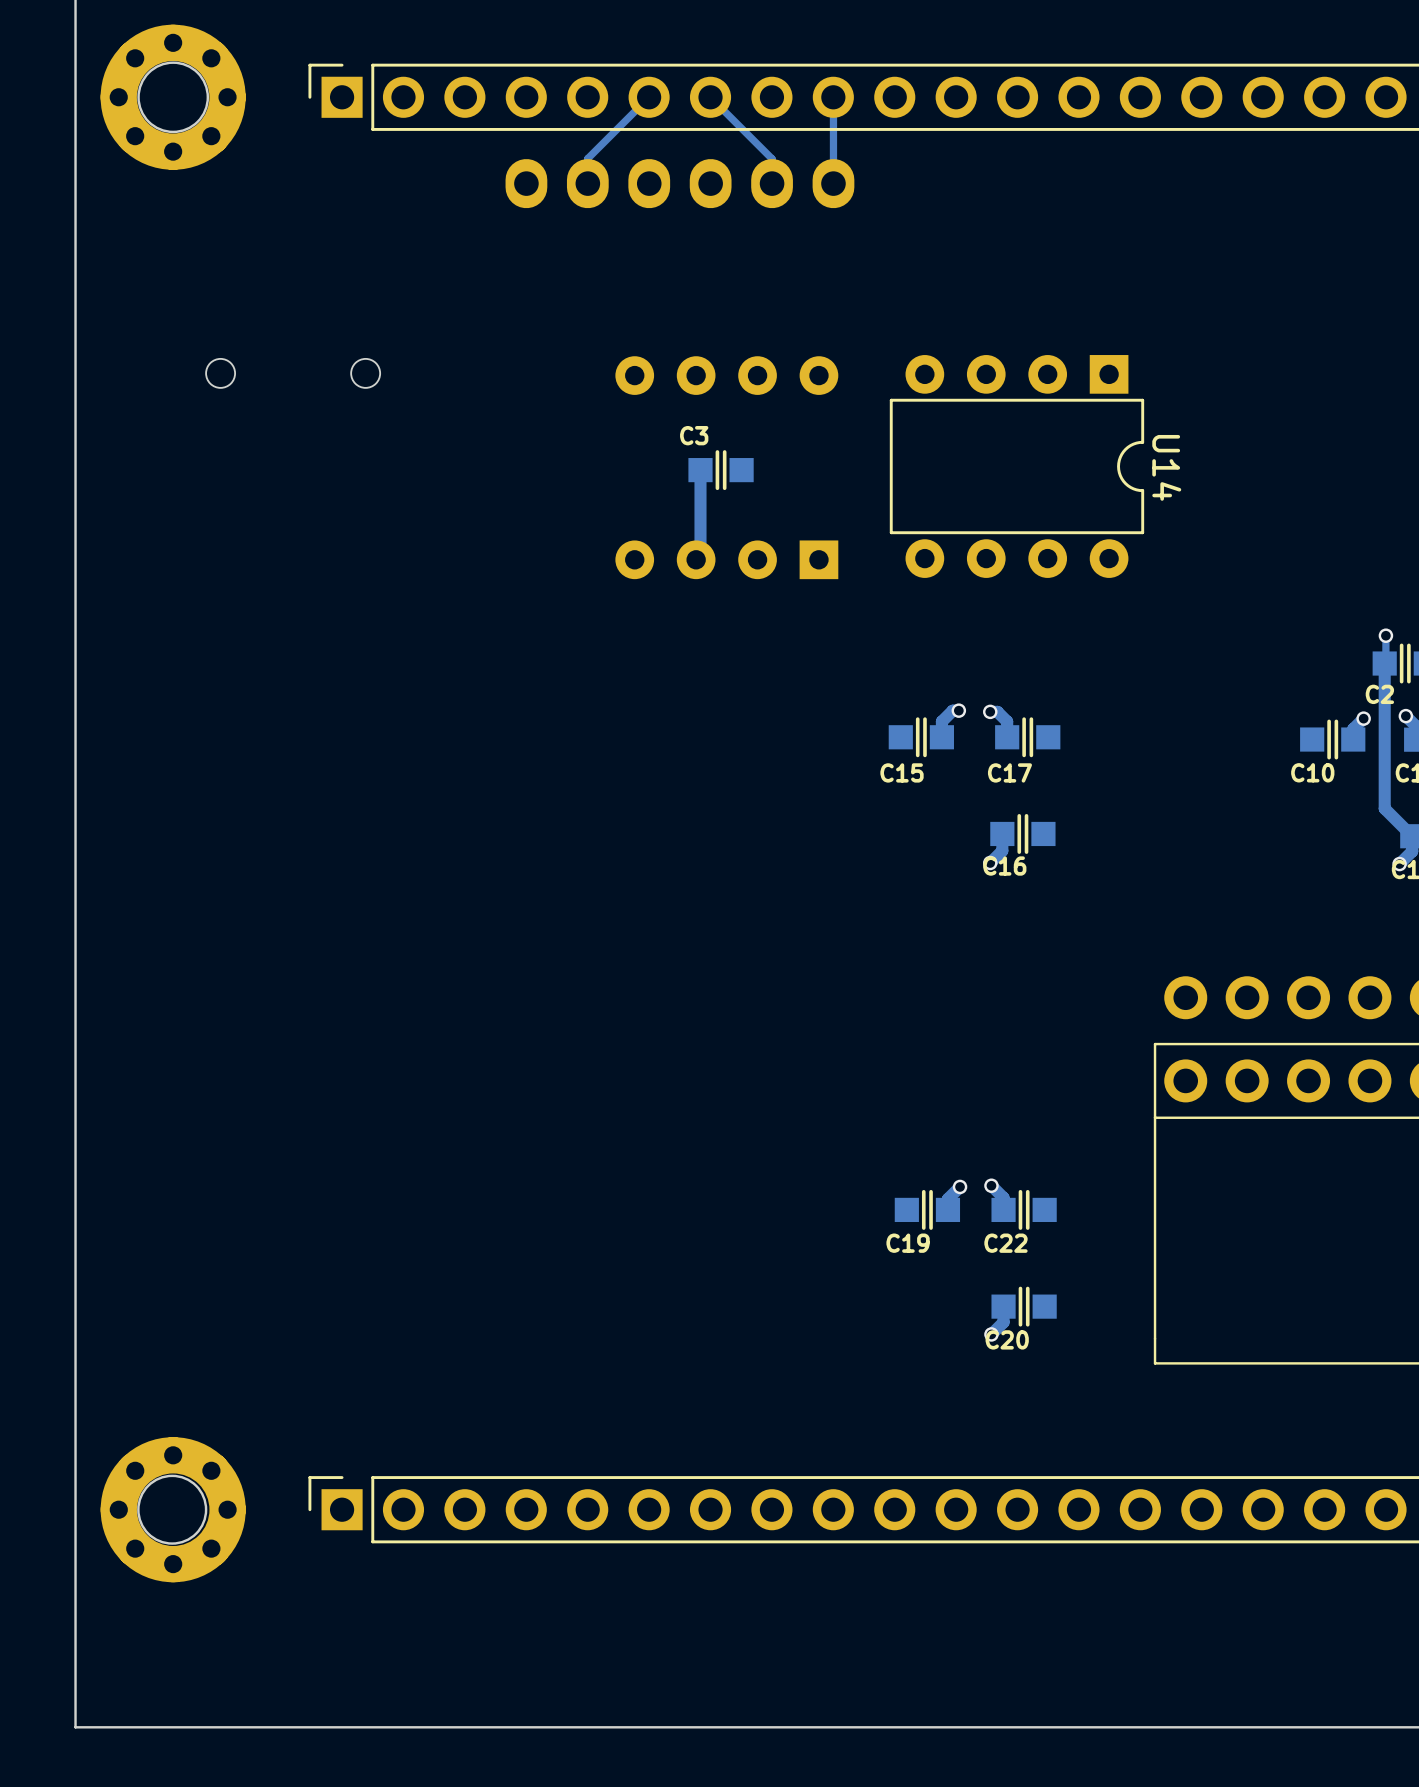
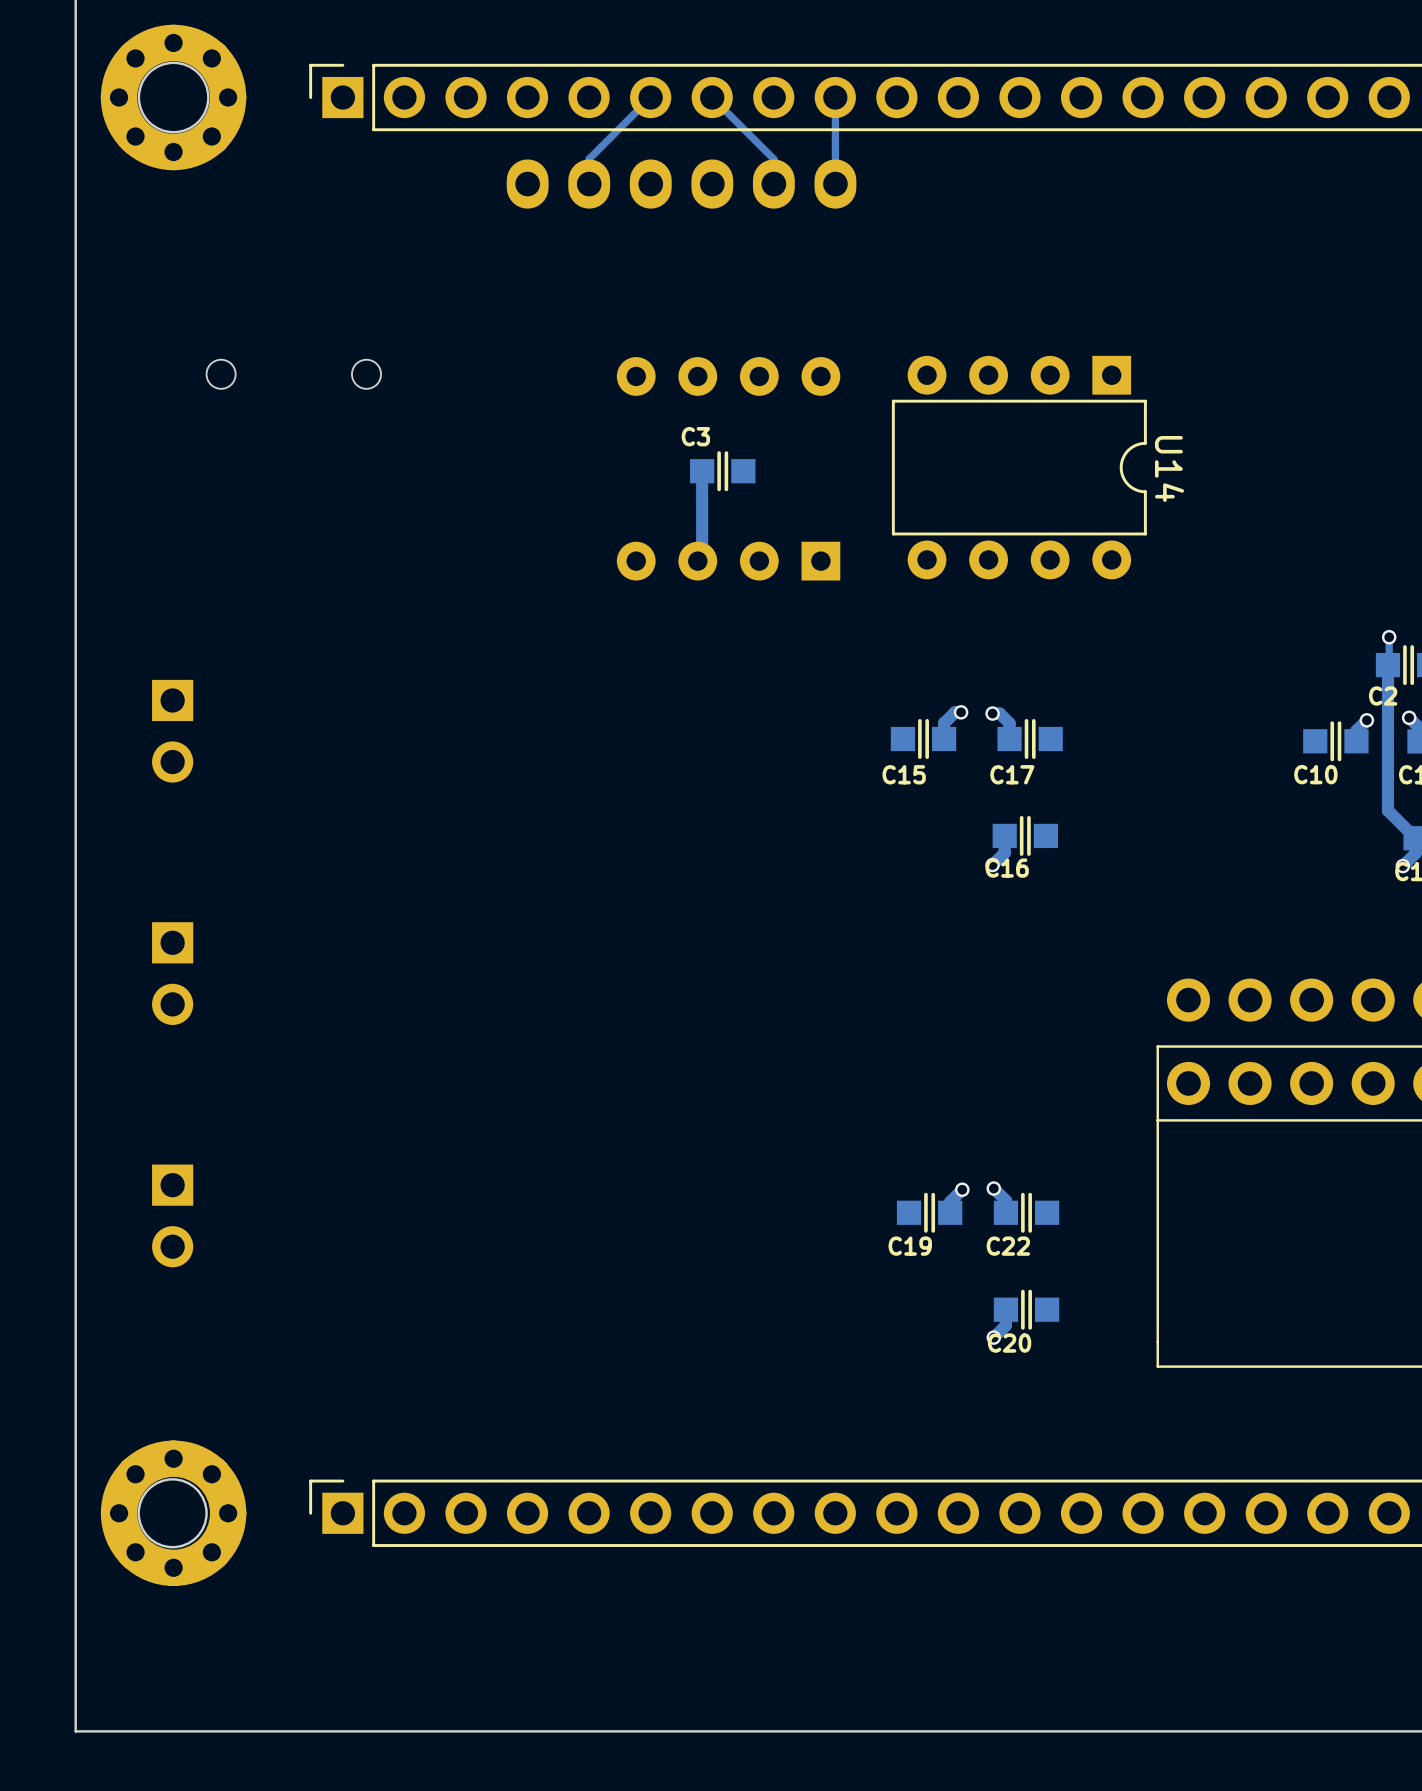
part: none -> (172, 731)
part: none -> (172, 973)
part: none -> (172, 1215)

